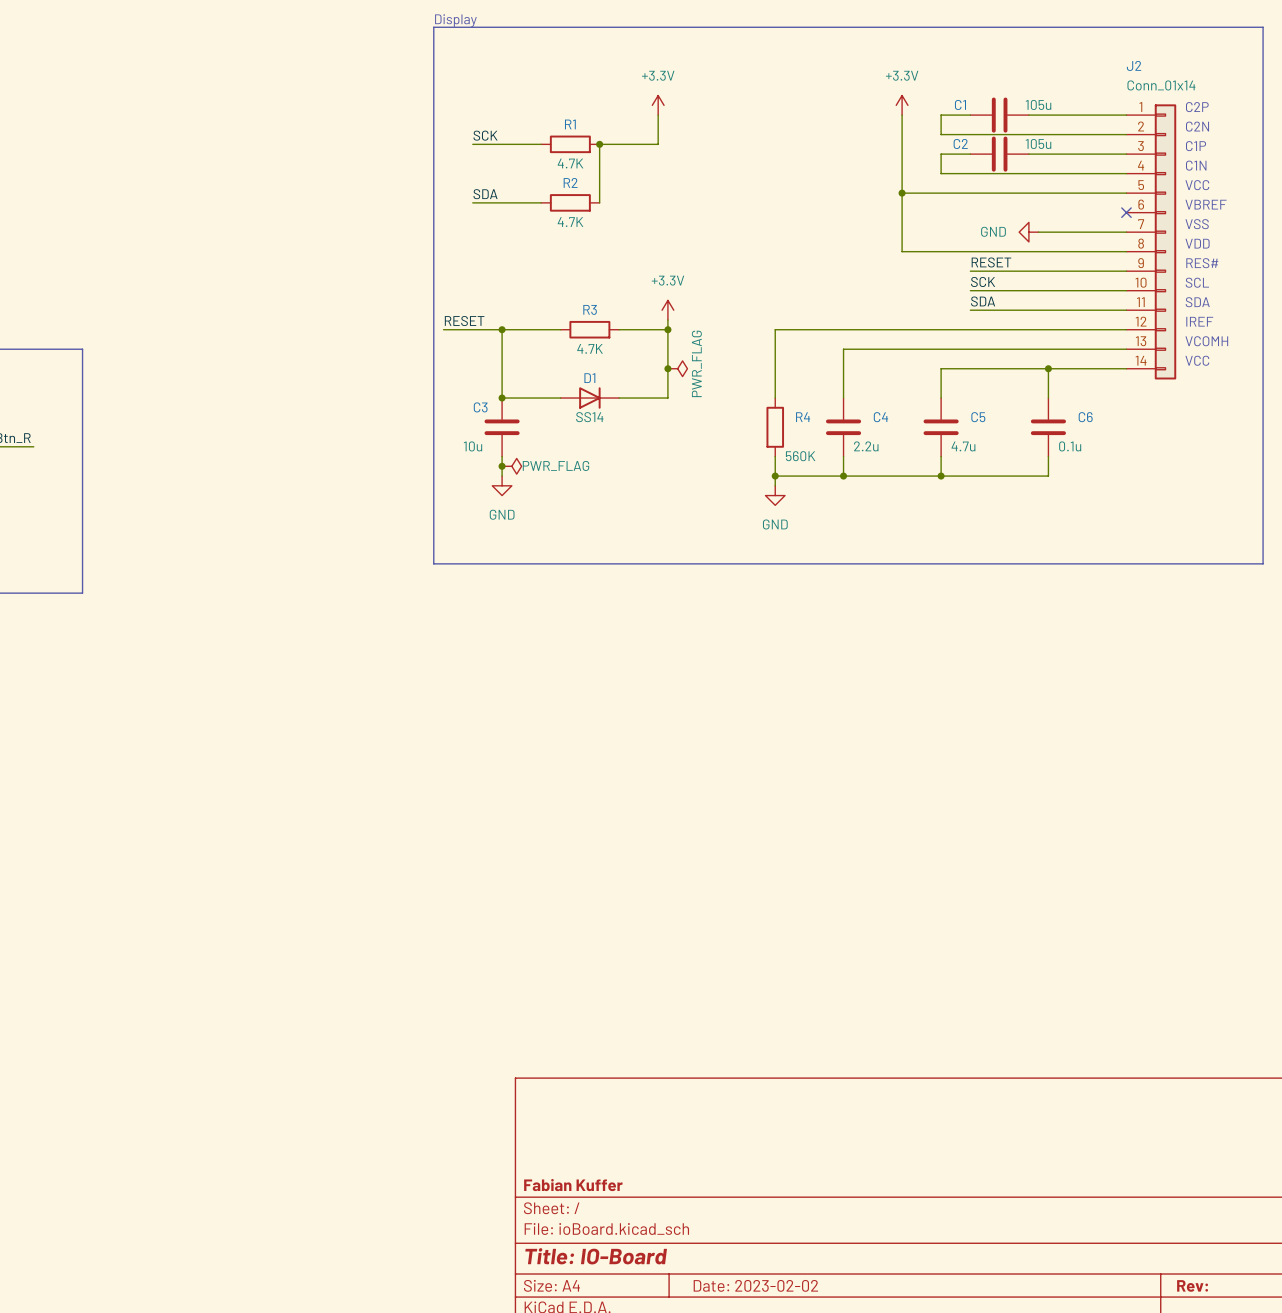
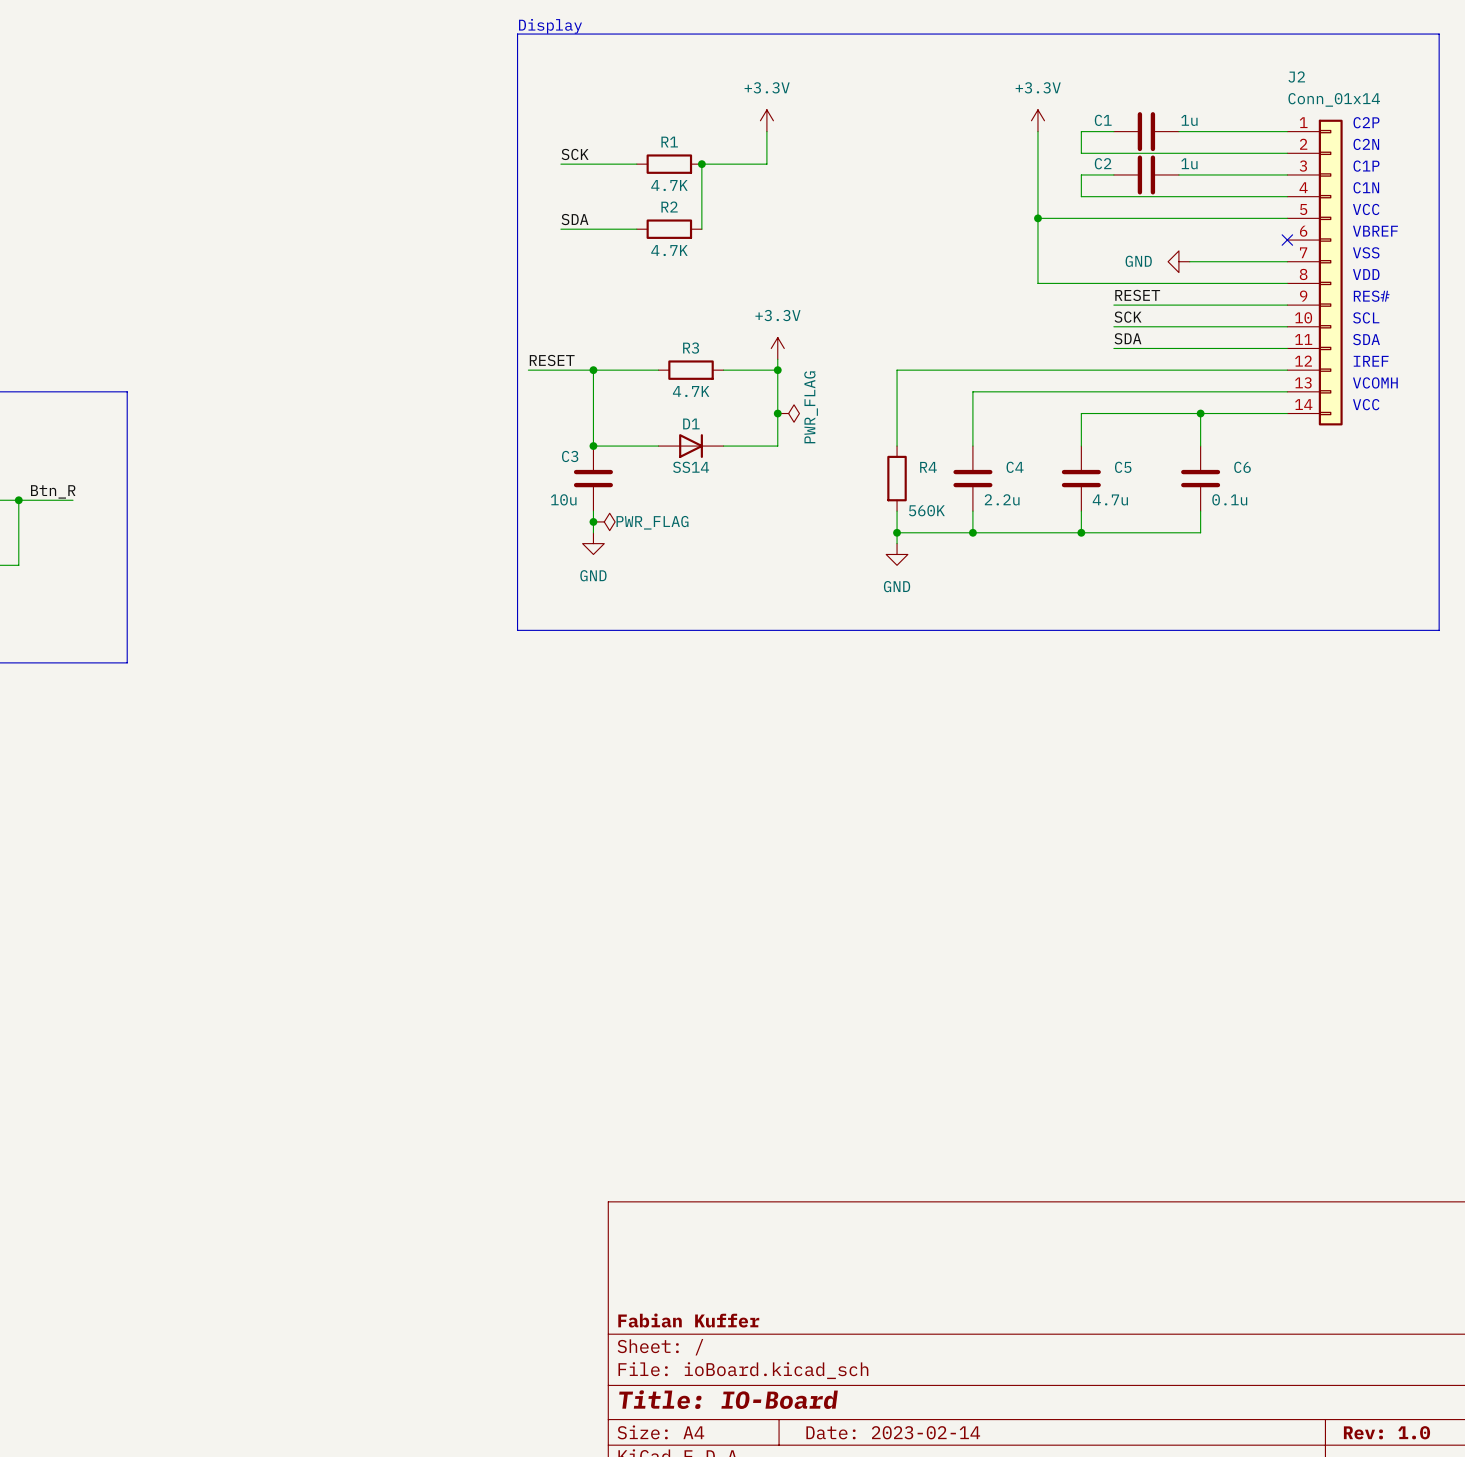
C1 value: 105u (1038, 104) -> 1u (1189, 120)
C2 value: 105u (1038, 143) -> 1u (1189, 163)
title block: Date: 2023-02-02 (755, 1285) -> Date: 2023-02-14 (893, 1432)
title block: Rev: (1192, 1285) -> Rev: 1.0 (1386, 1432)

